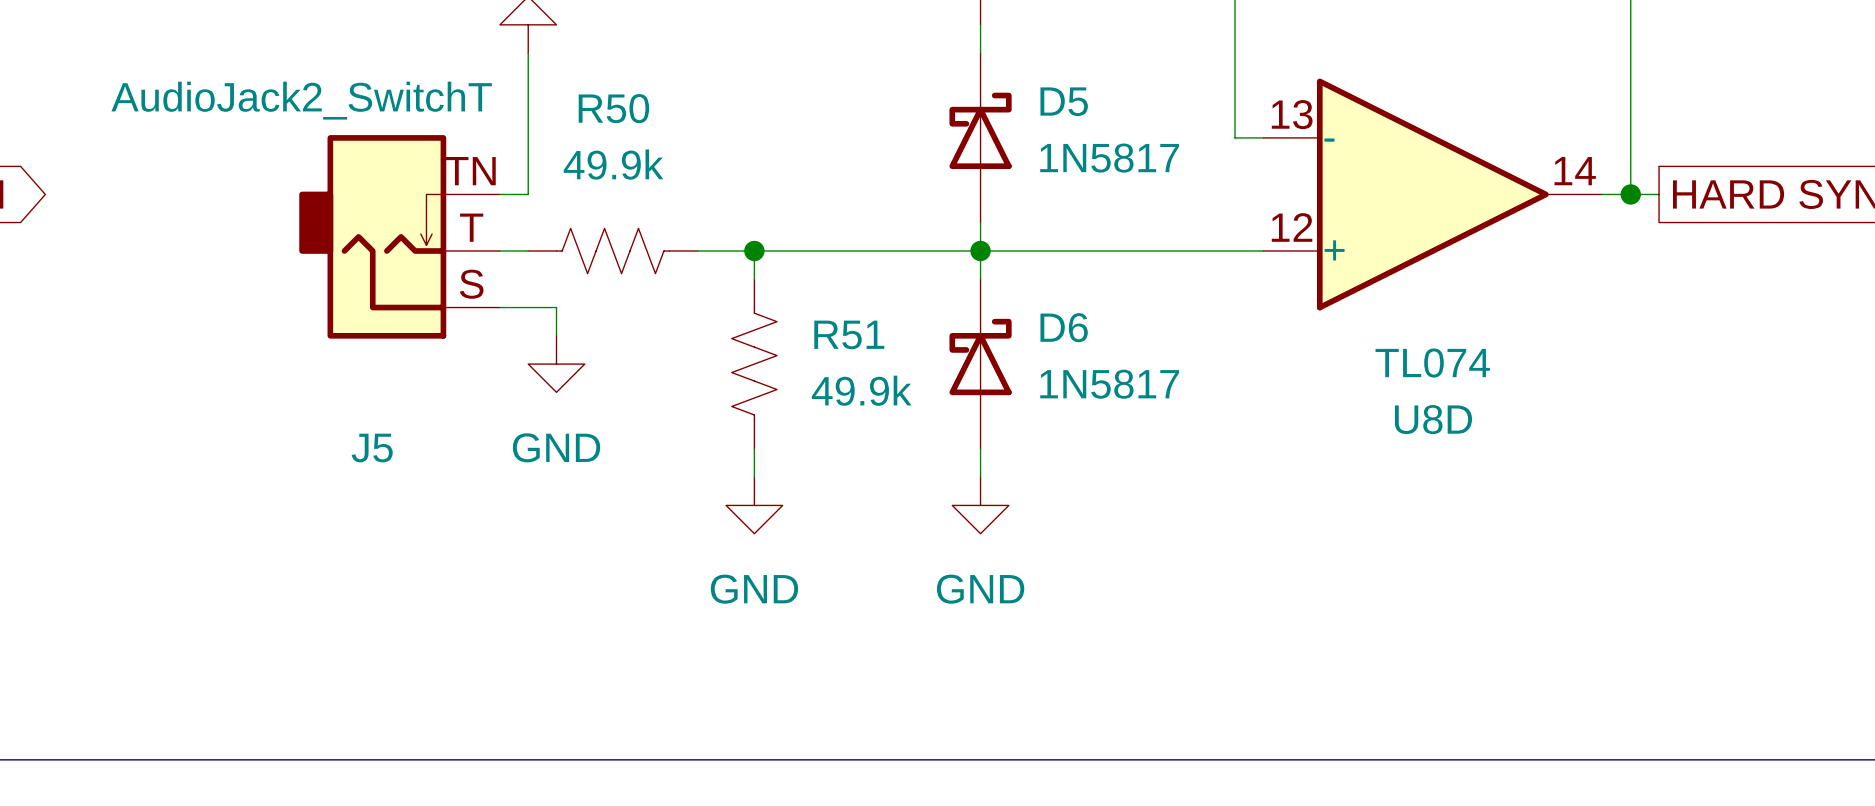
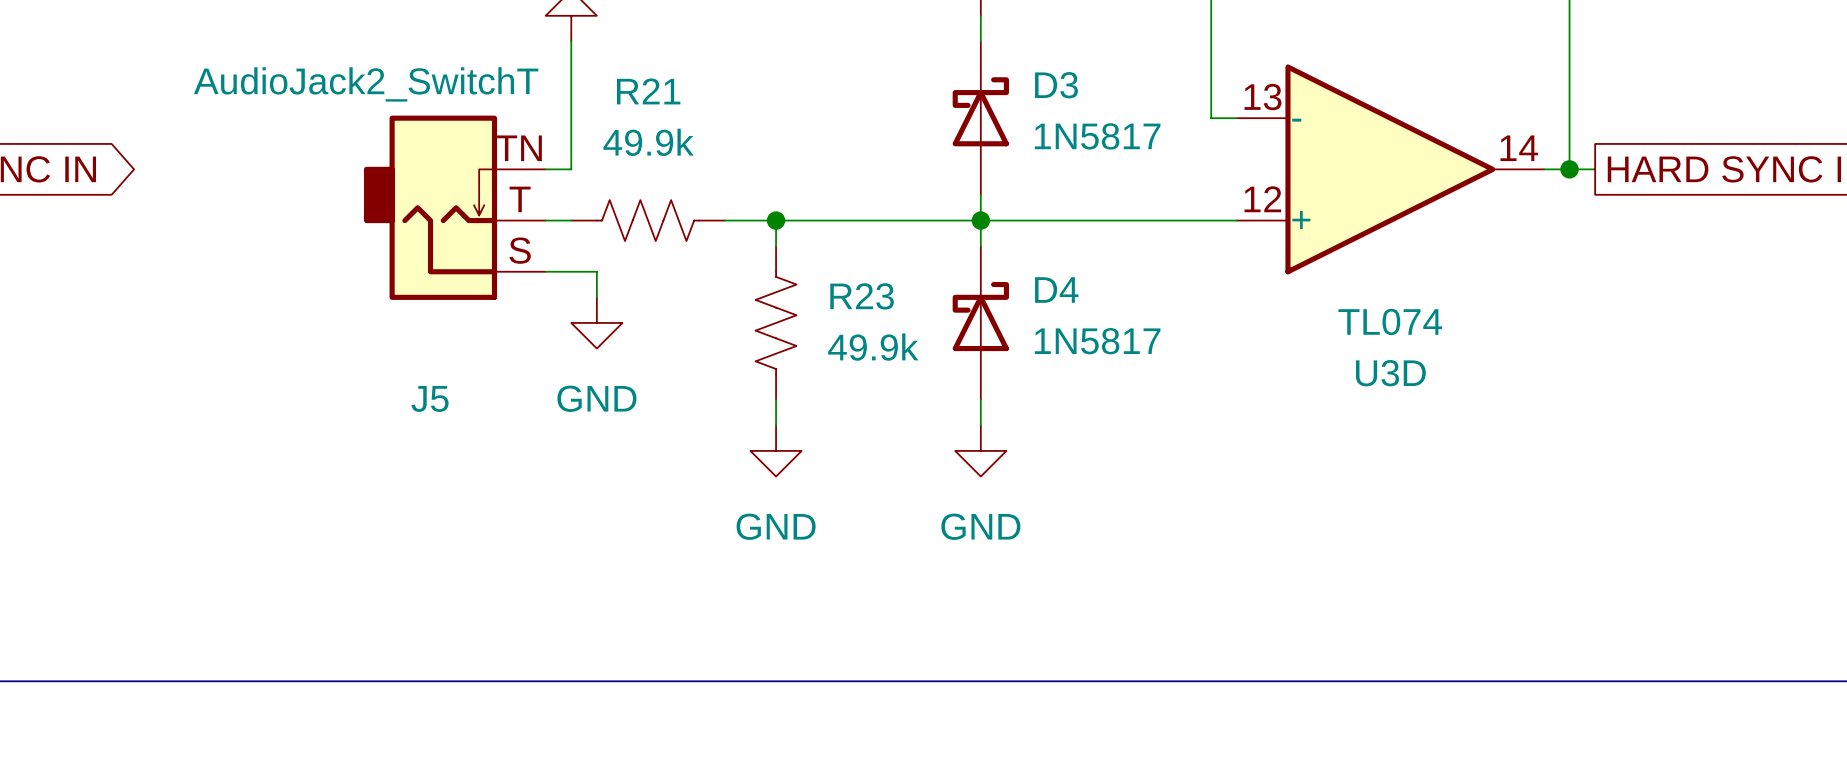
D5 name: D5 (1064, 101) -> D3 (1056, 85)
R50 name: R50 (613, 108) -> R21 (648, 91)
D6 name: D6 (1064, 327) -> D4 (1056, 289)
R51 name: R51 (849, 334) -> R23 (862, 296)
U8D name: U8D (1433, 419) -> U3D (1390, 373)

